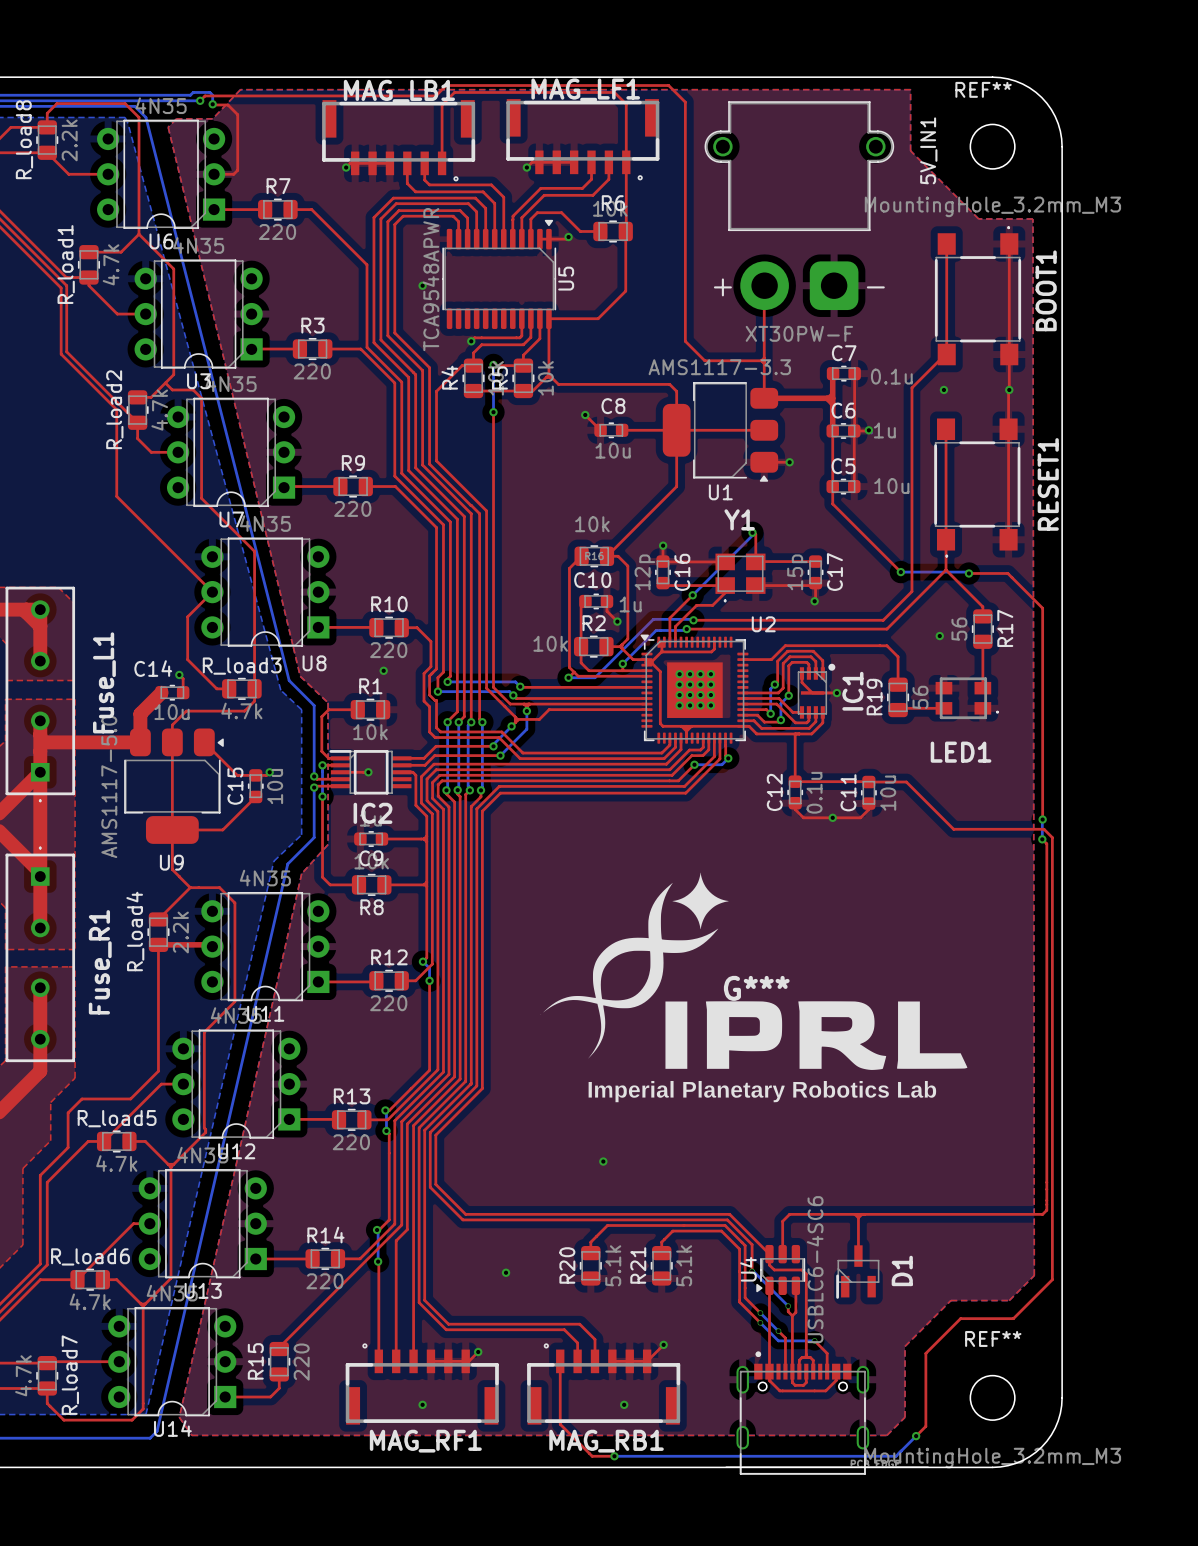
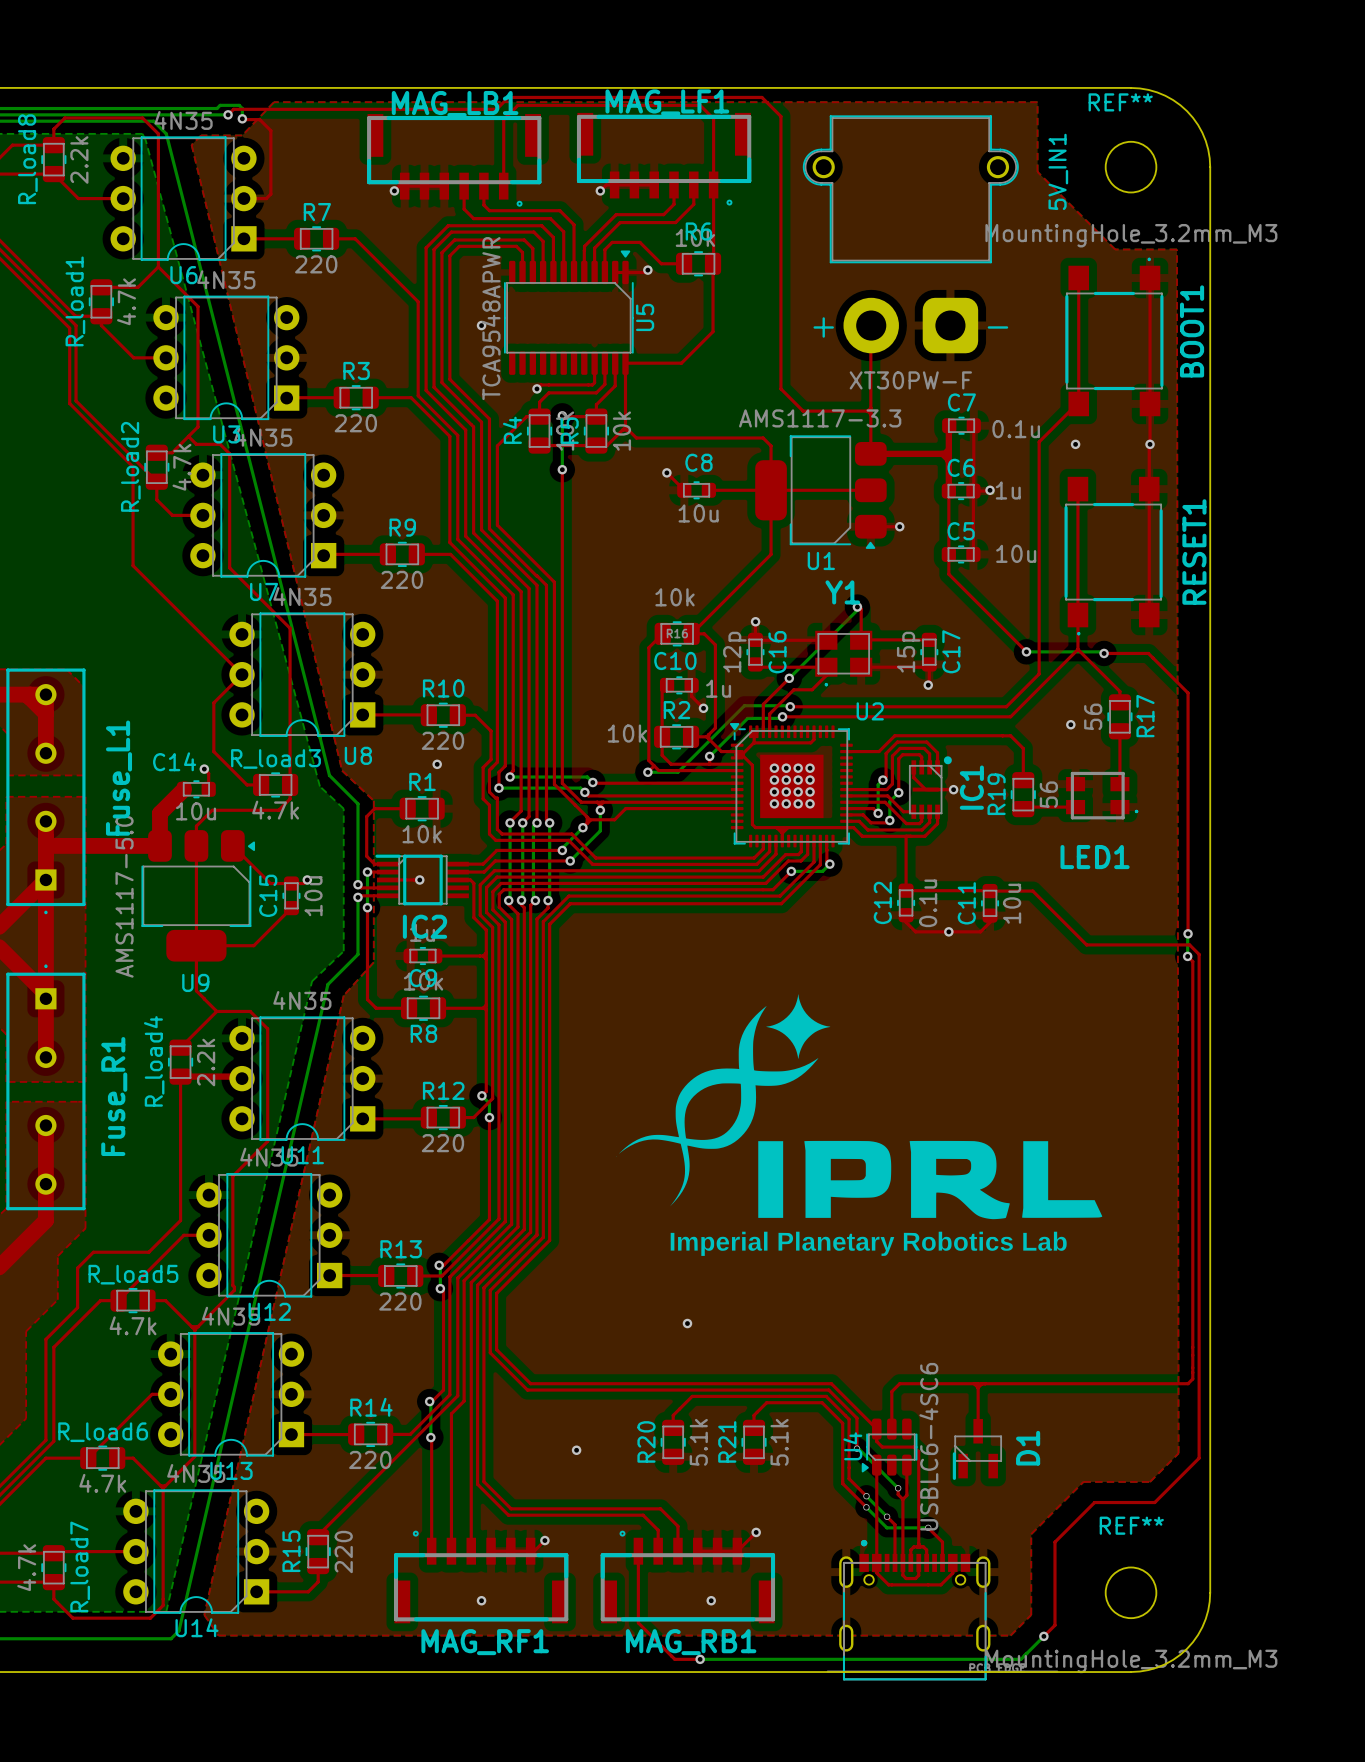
drawing: none -> [616, 994, 1103, 1256]
G***: (754, 987) -> none

